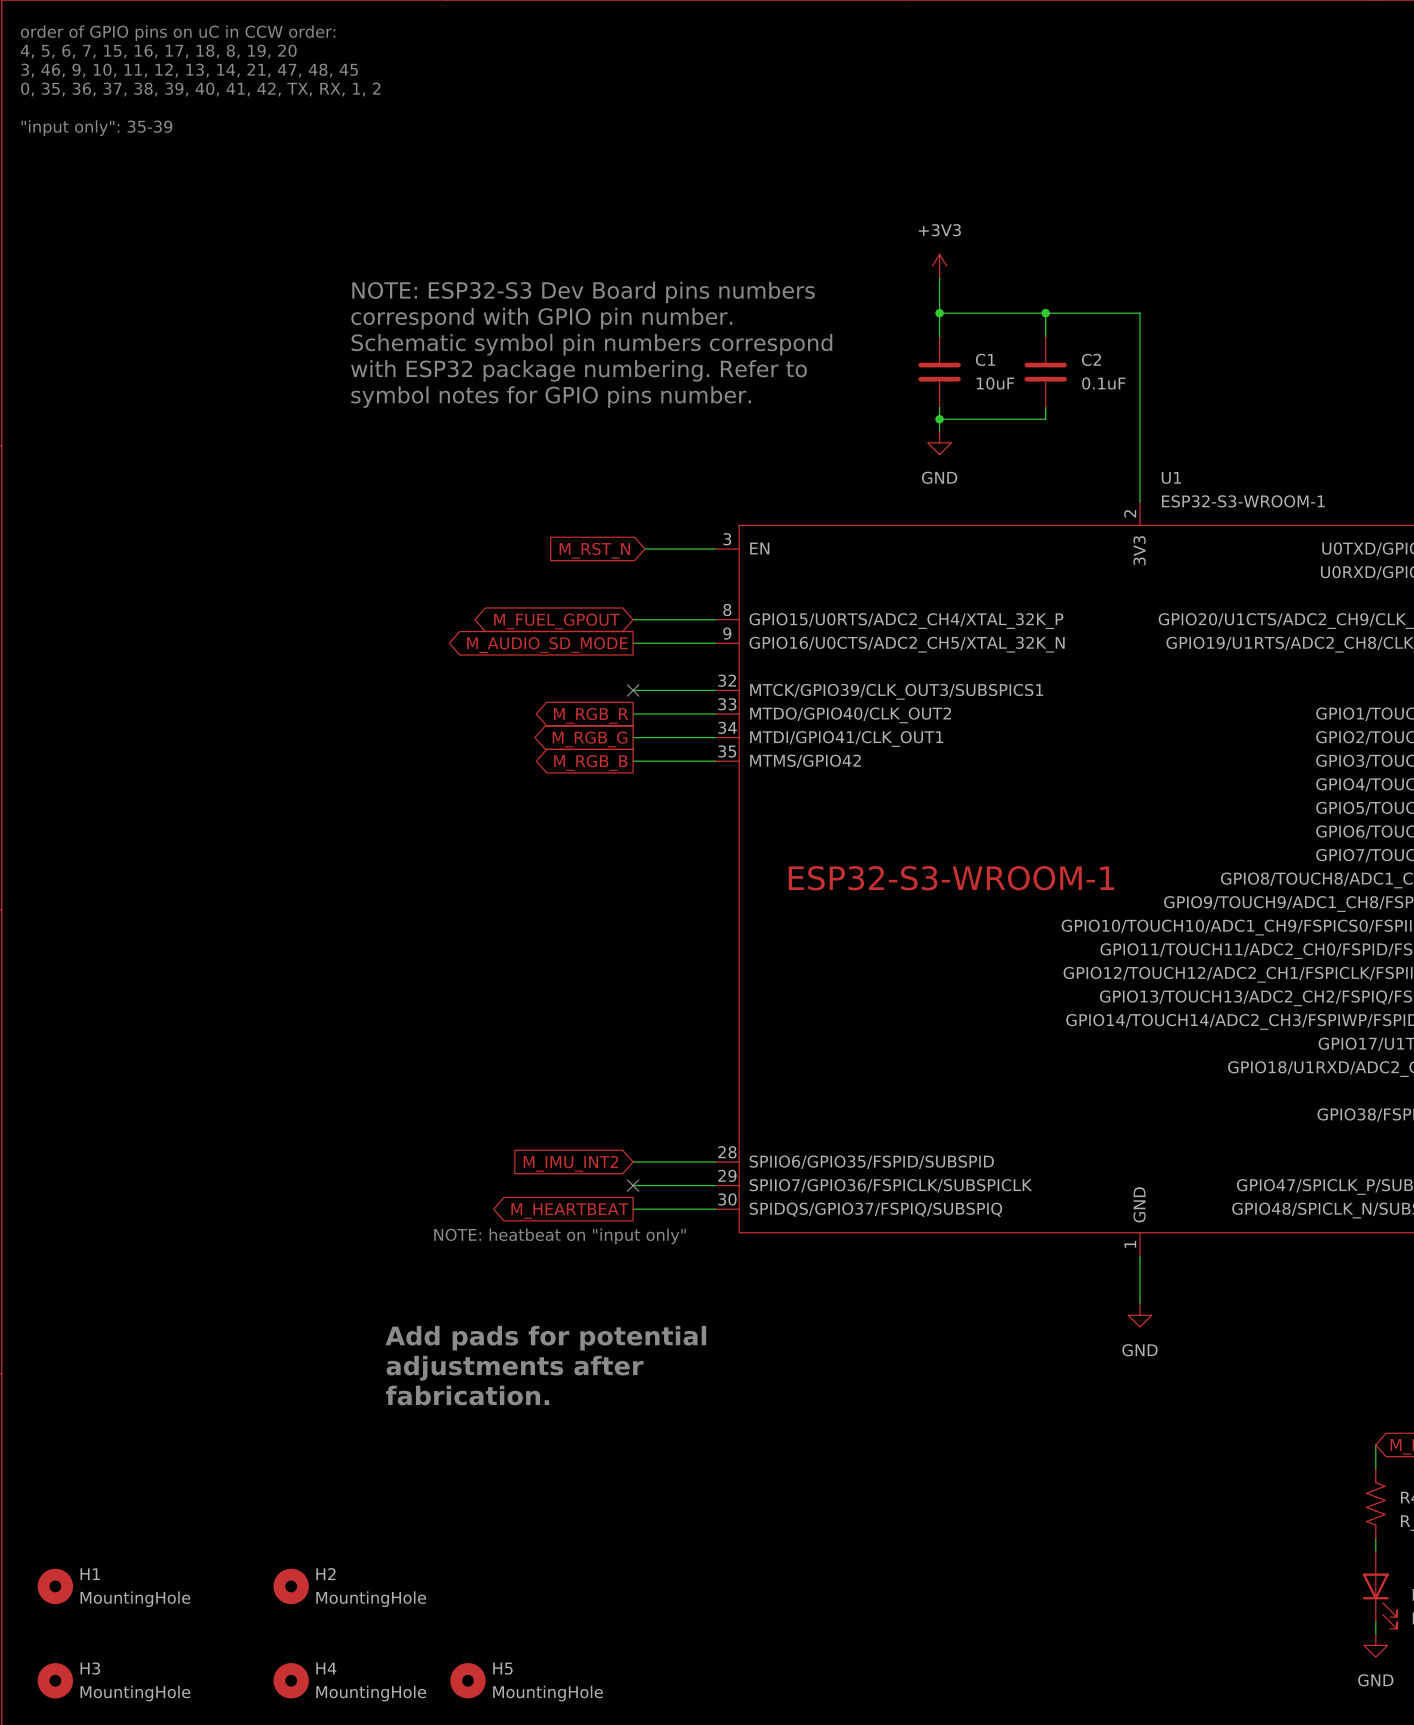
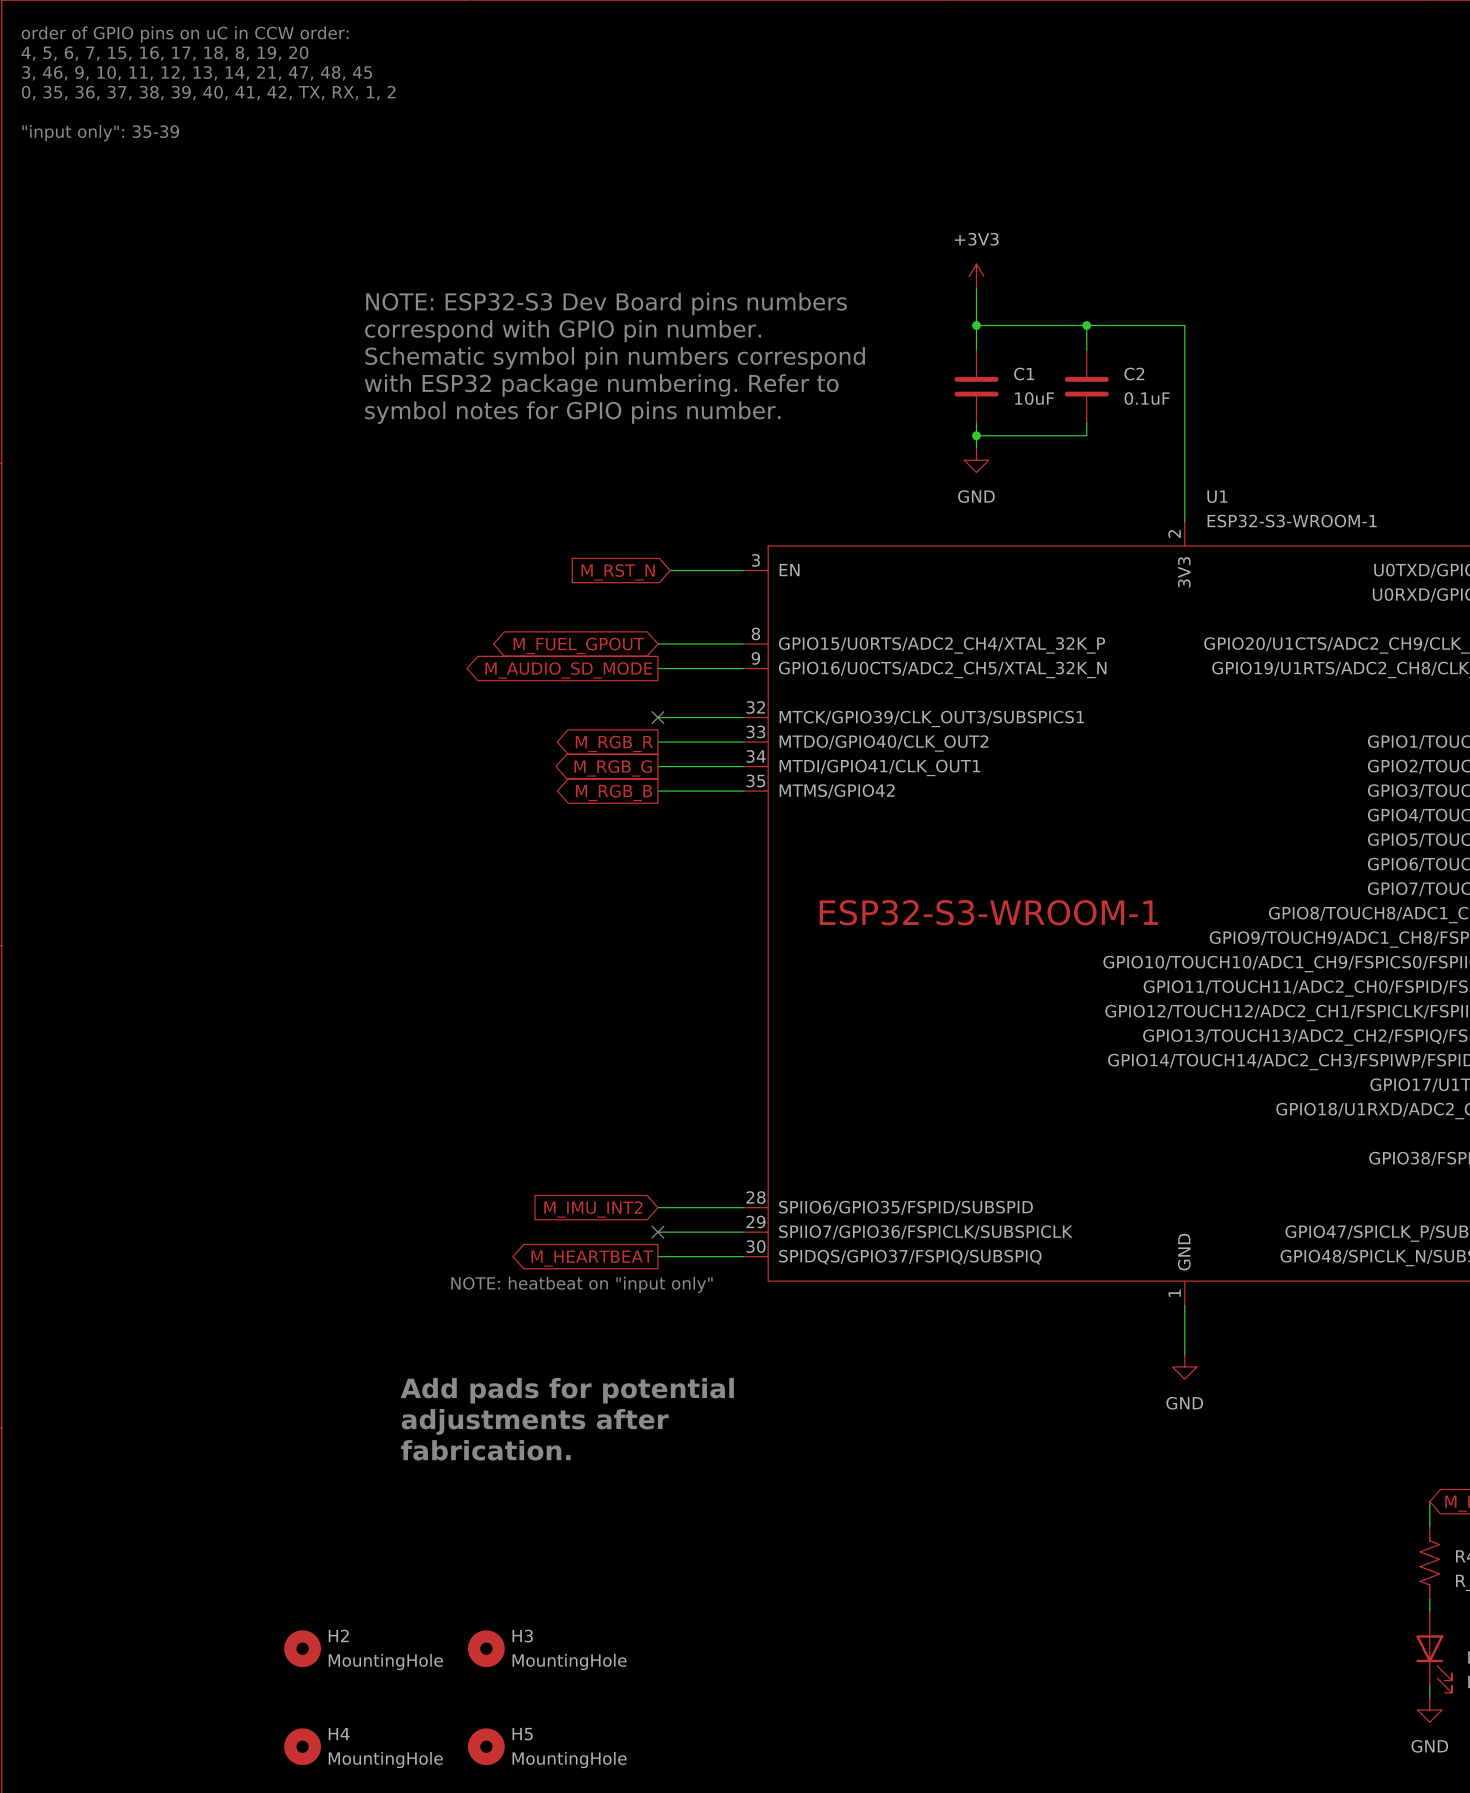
H1: MountingHole (55, 1586) -> none
H3 position: (55, 1680) -> (486, 1648)

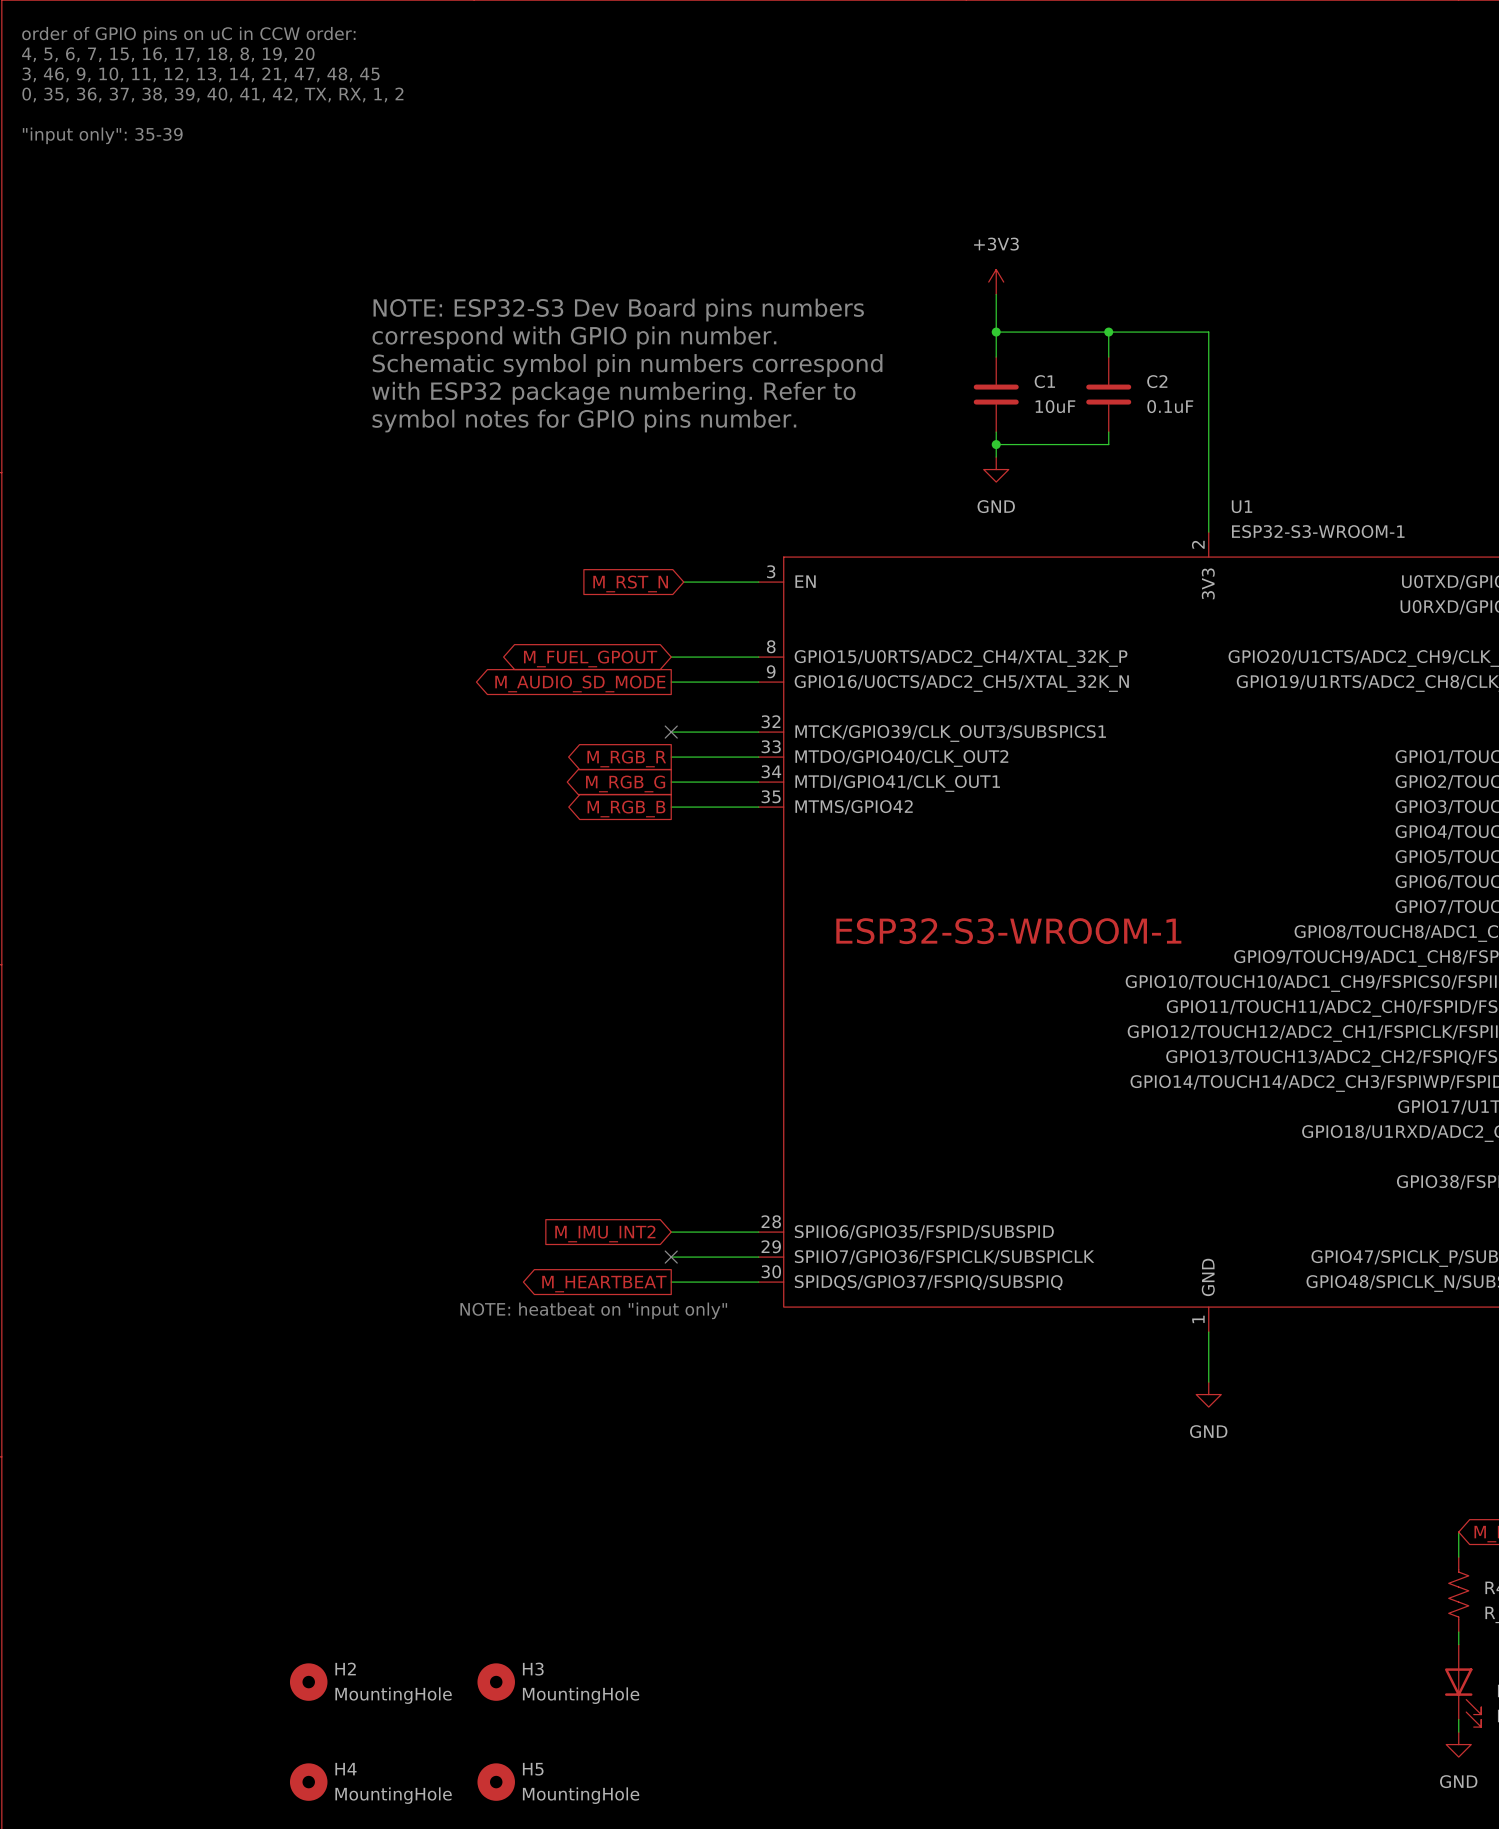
text: Add pads for potential (567, 1390) -> none
text: adjustments after (535, 1421) -> none
text: fabrication. (485, 1450) -> none

